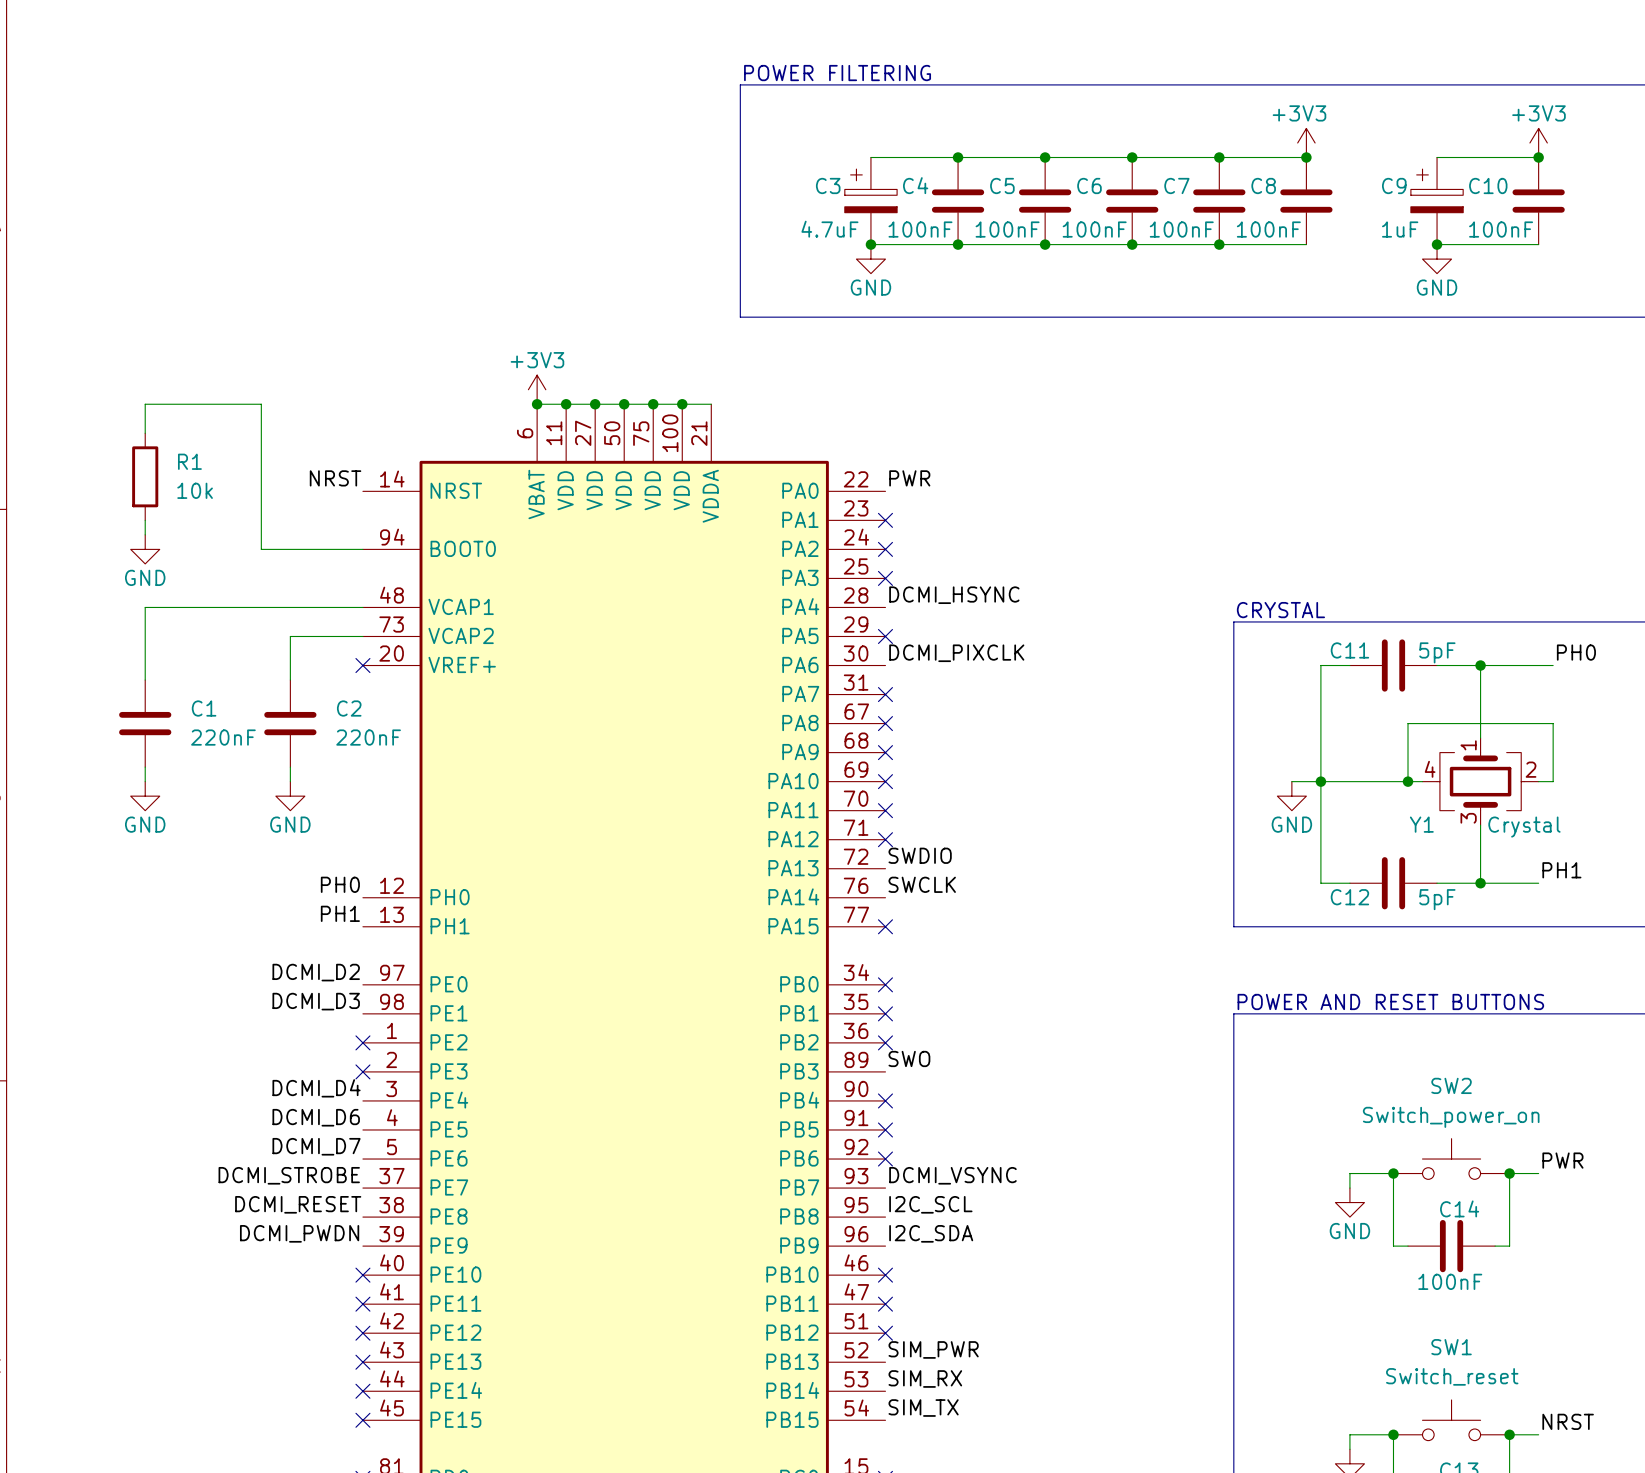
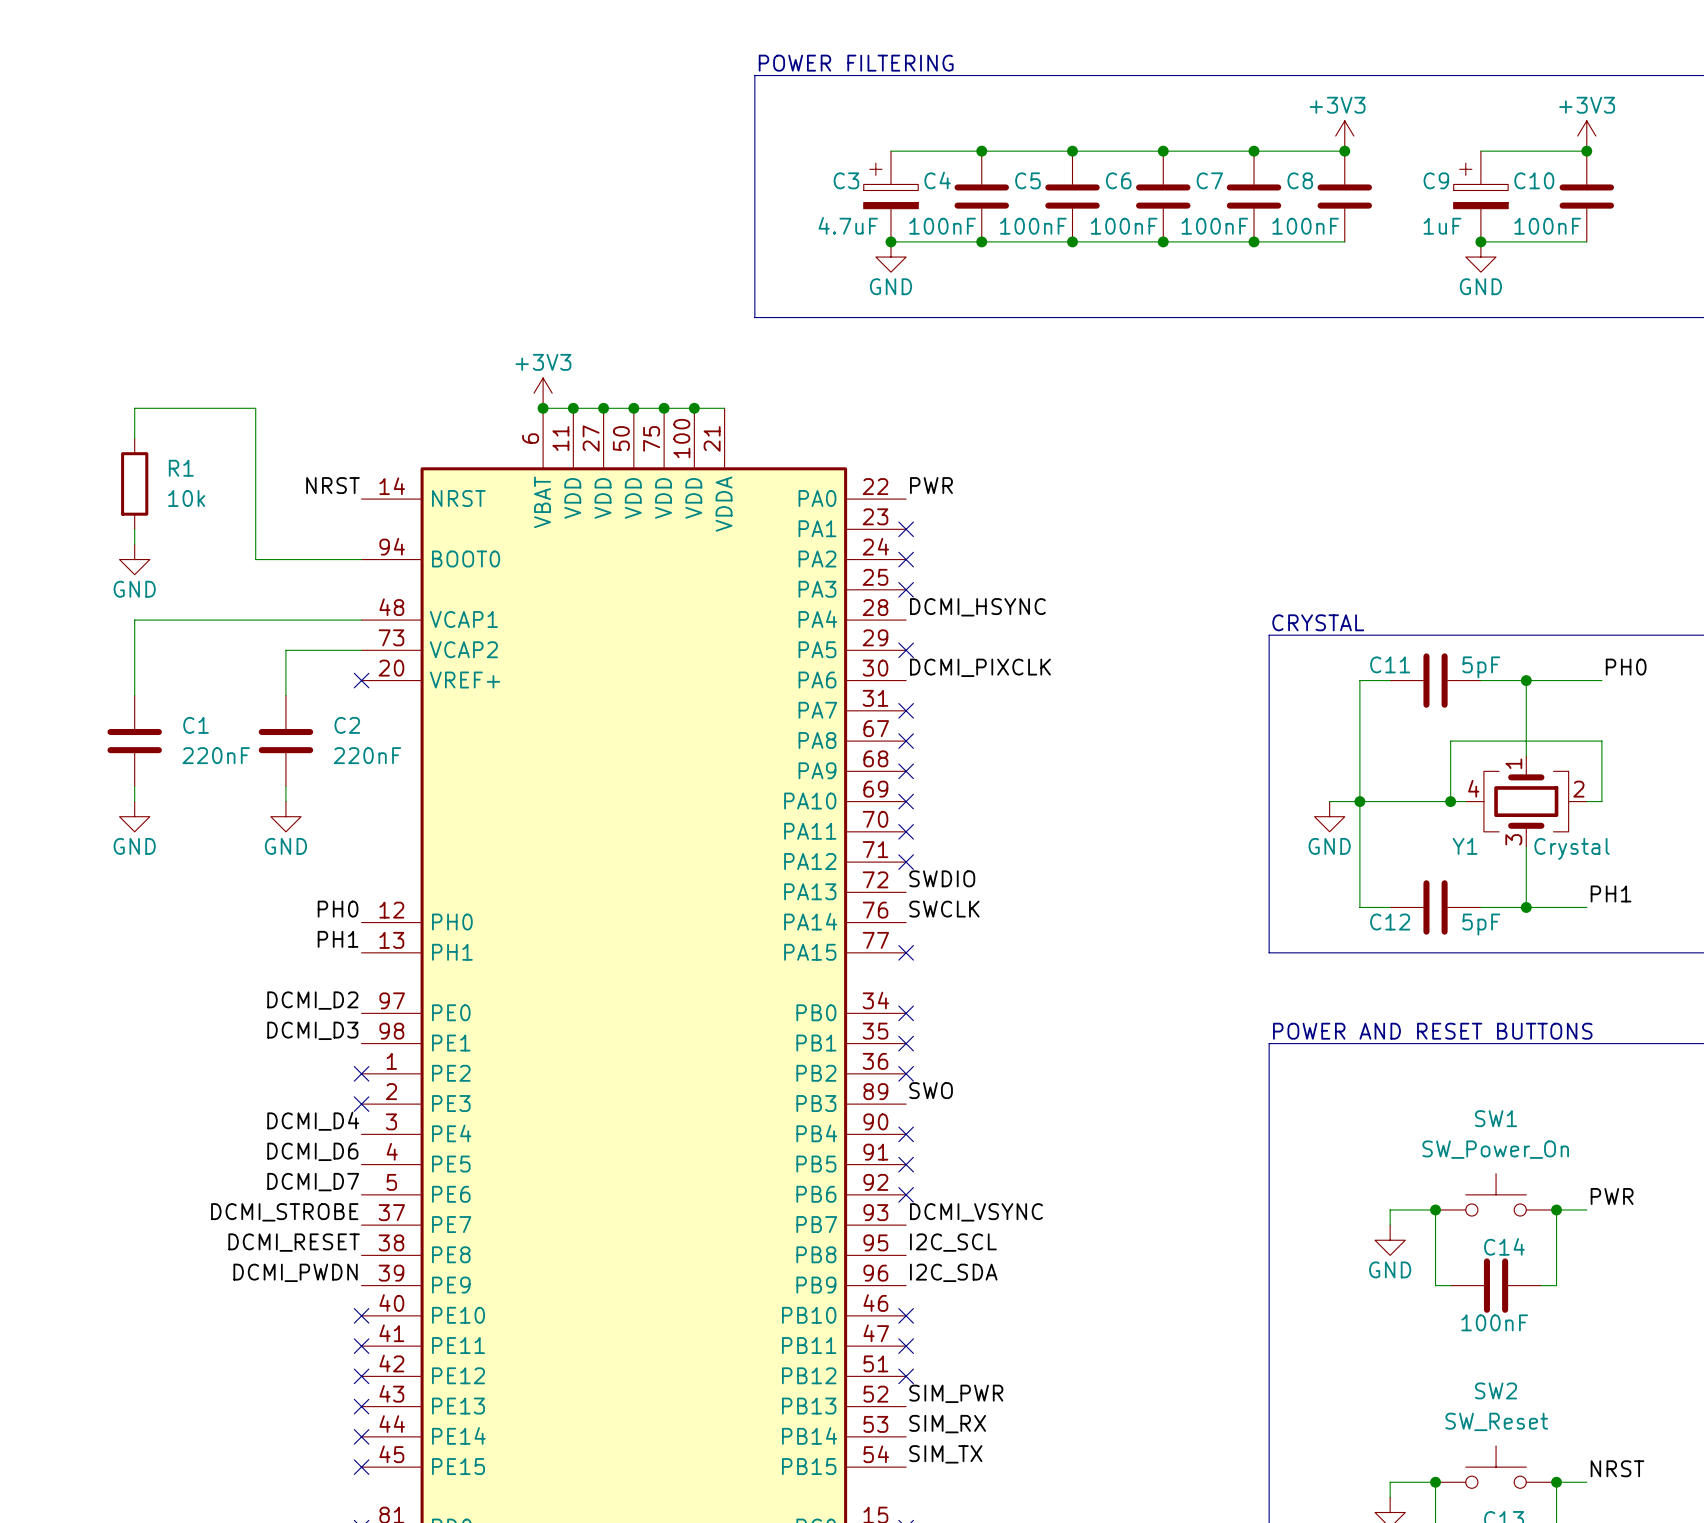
SW2 name: SW2 (1451, 1085) -> SW1 (1496, 1118)
SW2 value: Switch_power_on (1451, 1117) -> SW_Power_On (1495, 1149)
SW1 name: SW1 (1451, 1347) -> SW2 (1496, 1390)
SW1 value: Switch_reset (1452, 1376) -> SW_Reset (1496, 1421)

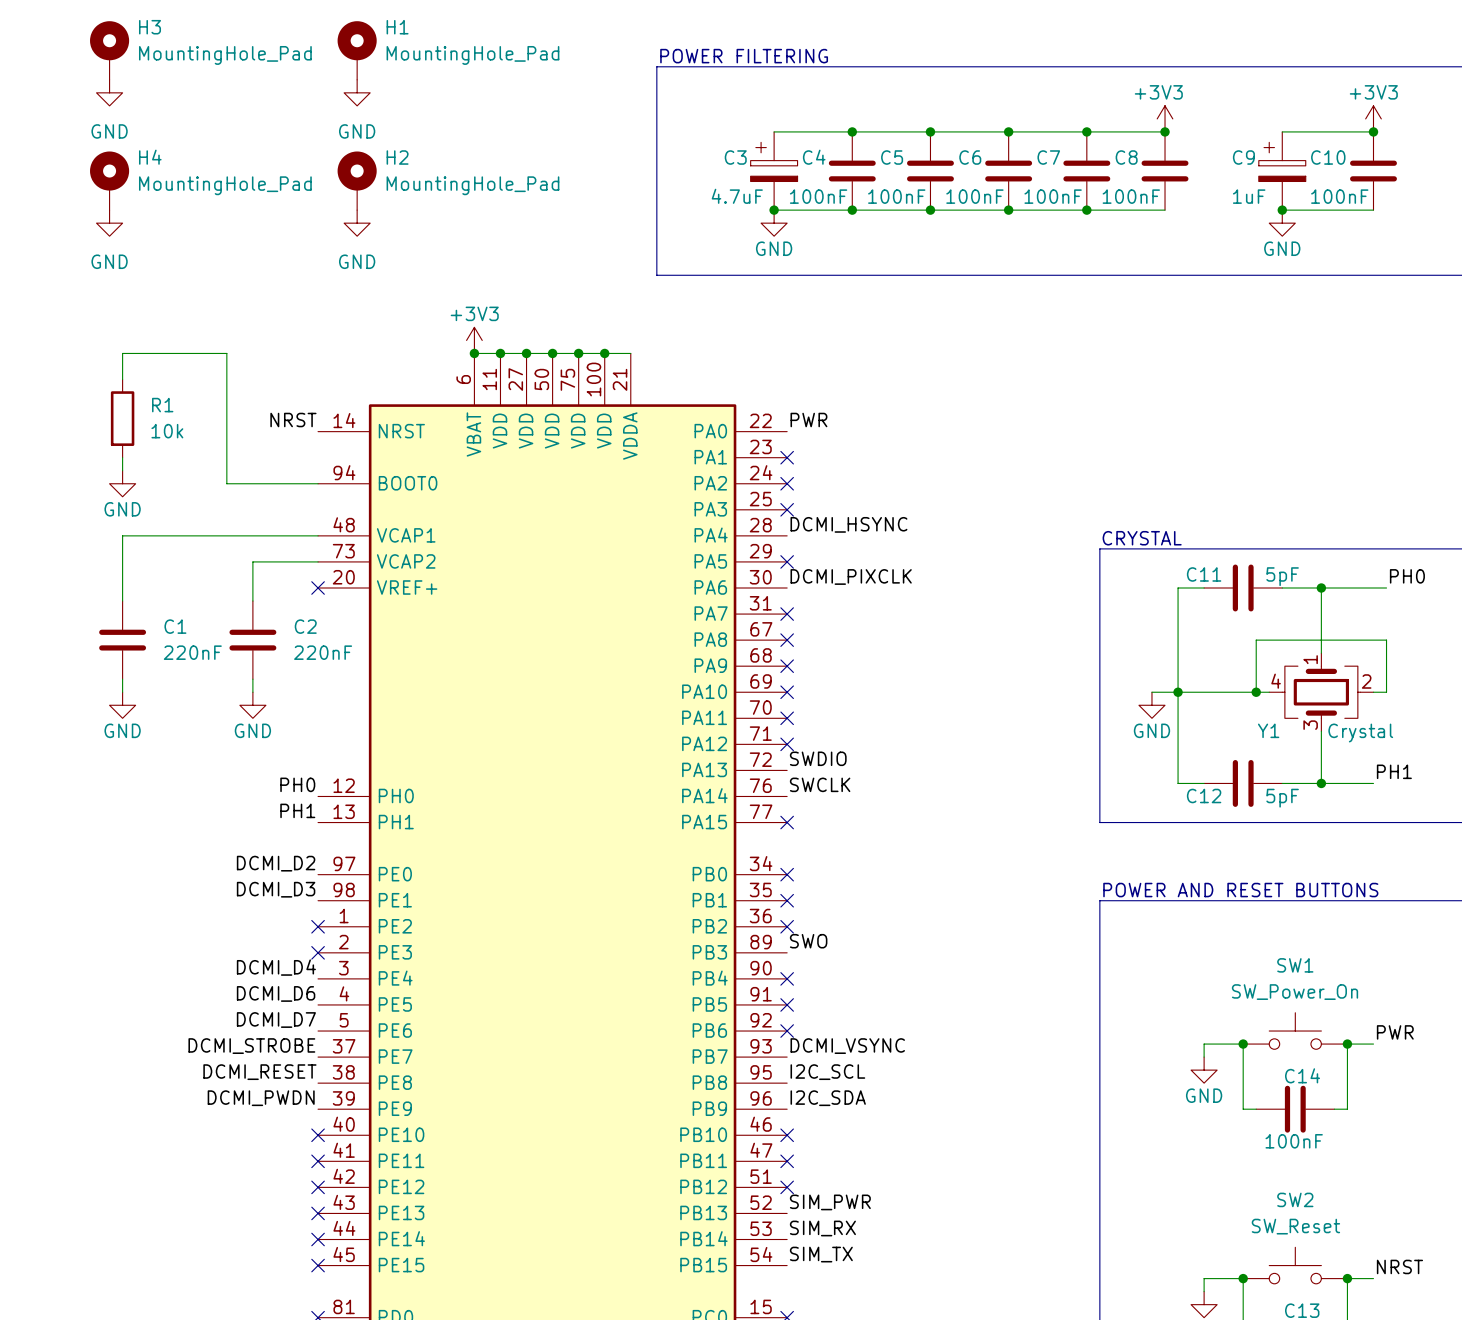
H3: none -> MountingHole_Pad (109, 50)
H1: none -> MountingHole_Pad (357, 50)
power symbol: none -> GND (109, 92)
power symbol: none -> GND (357, 92)
H4: none -> MountingHole_Pad (109, 180)
H2: none -> MountingHole_Pad (357, 180)
power symbol: none -> GND (109, 223)
power symbol: none -> GND (357, 223)

